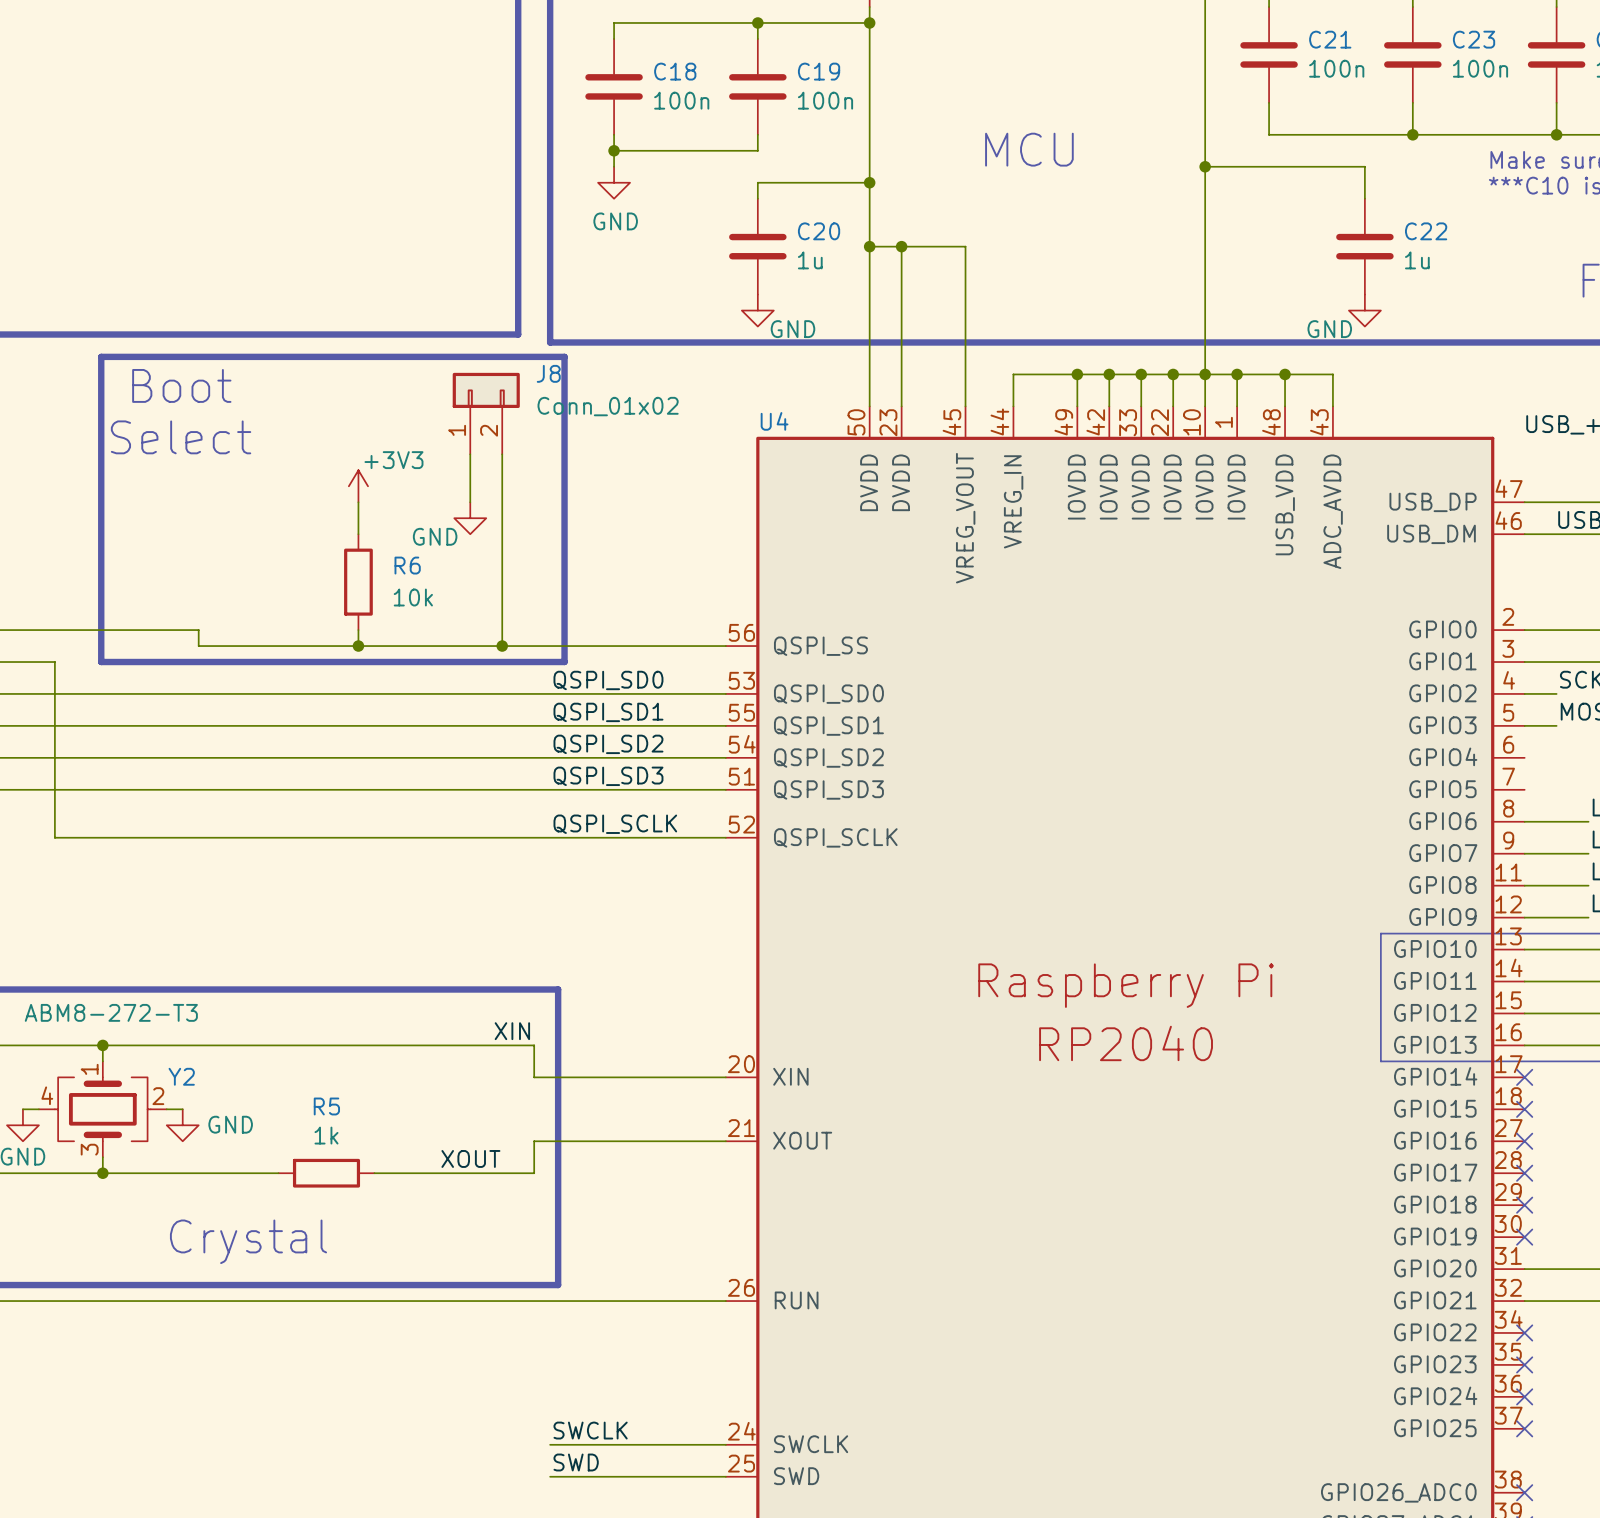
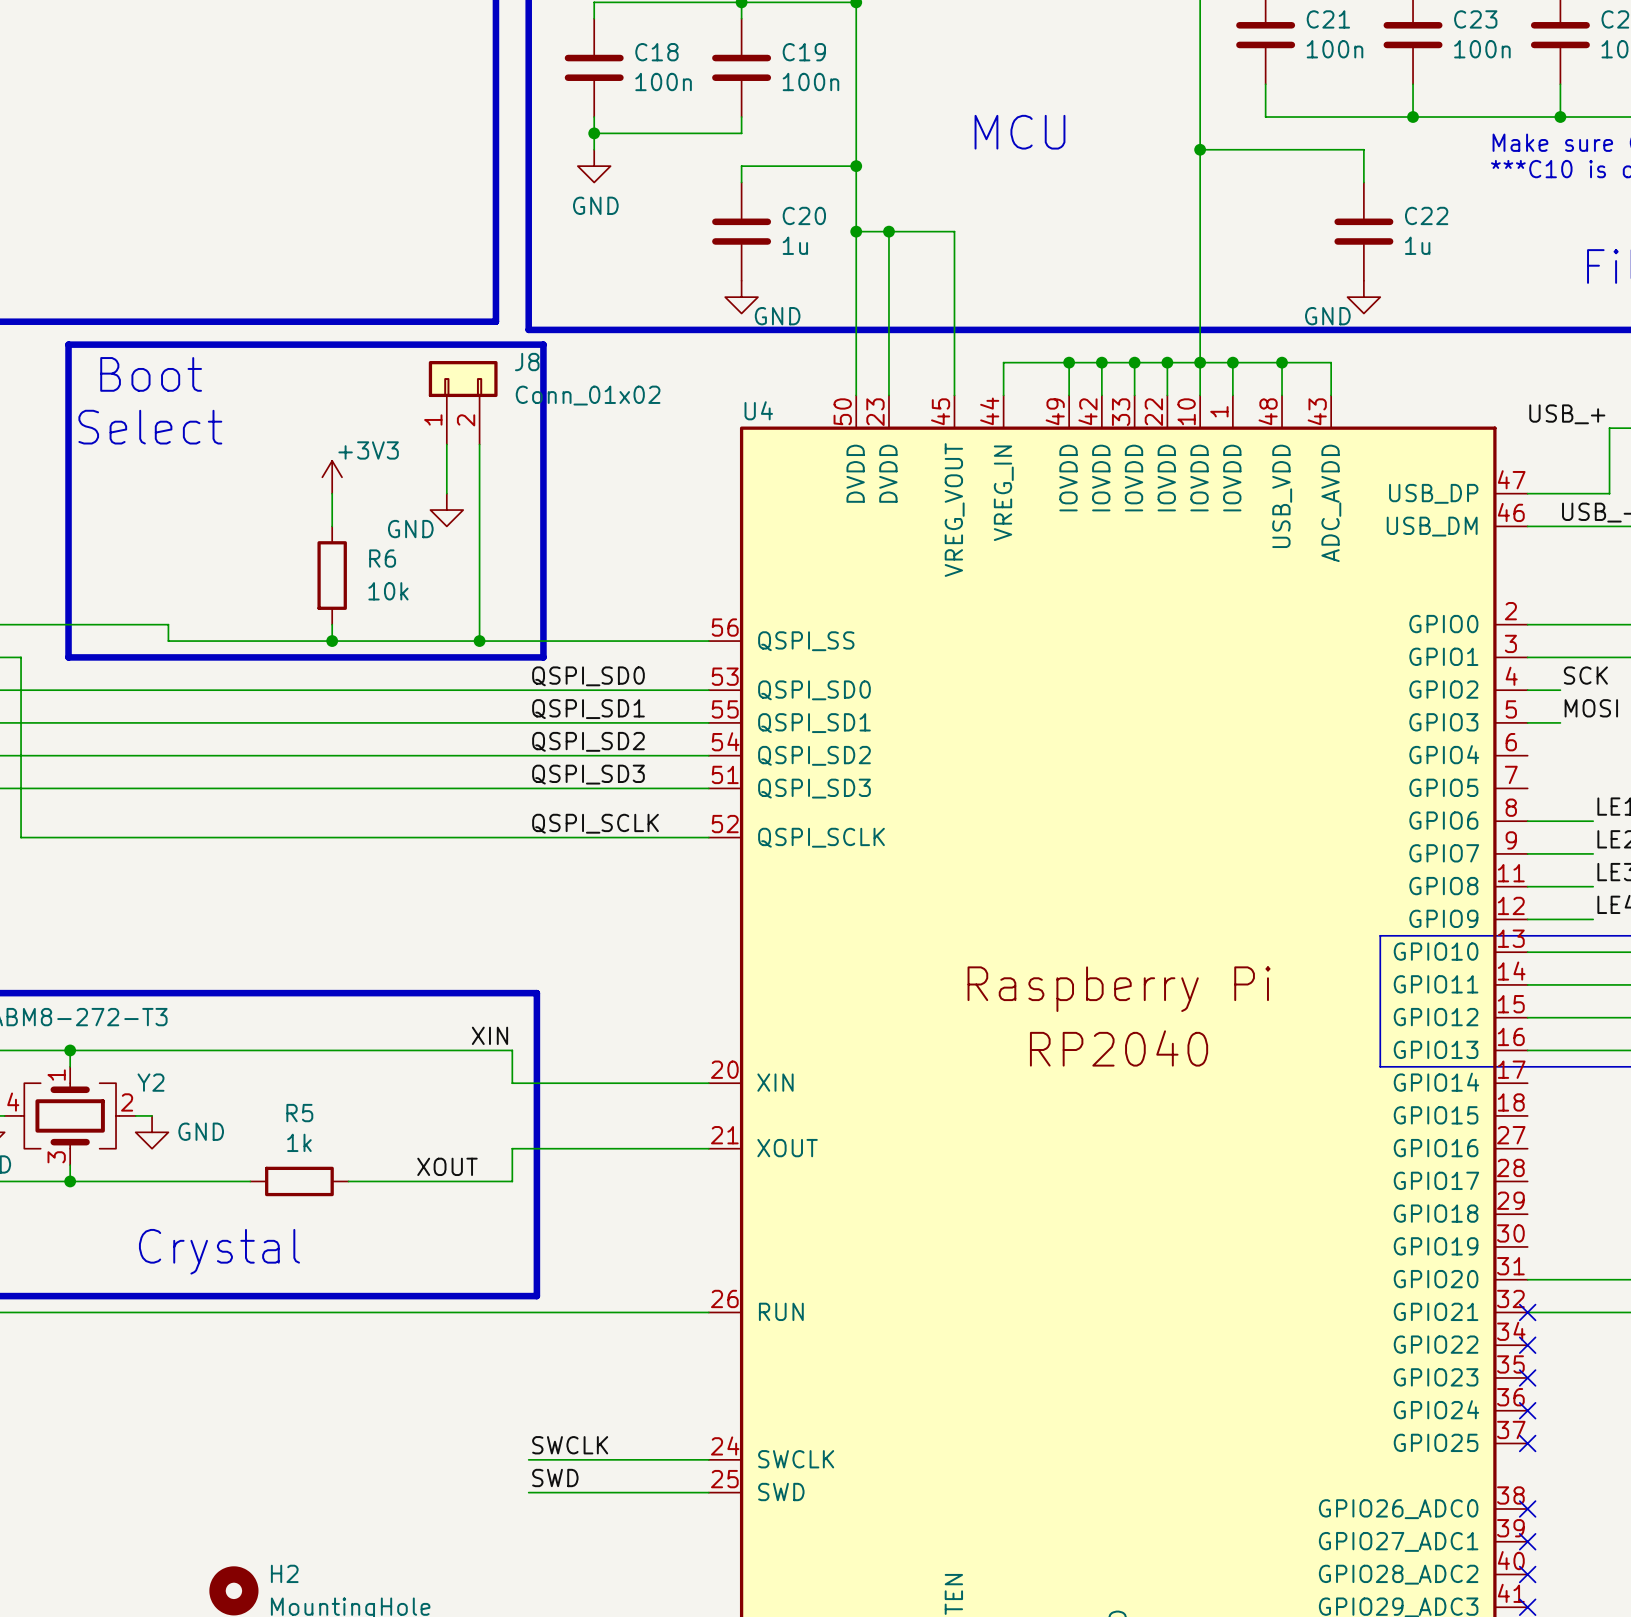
no-connect mark: (1524, 1077) -> none
no-connect mark: (1524, 1109) -> none
no-connect mark: (1524, 1141) -> none
no-connect mark: (1524, 1173) -> none
no-connect mark: (1524, 1205) -> none
no-connect mark: (1524, 1237) -> none
no-connect mark: none -> (1527, 1312)

